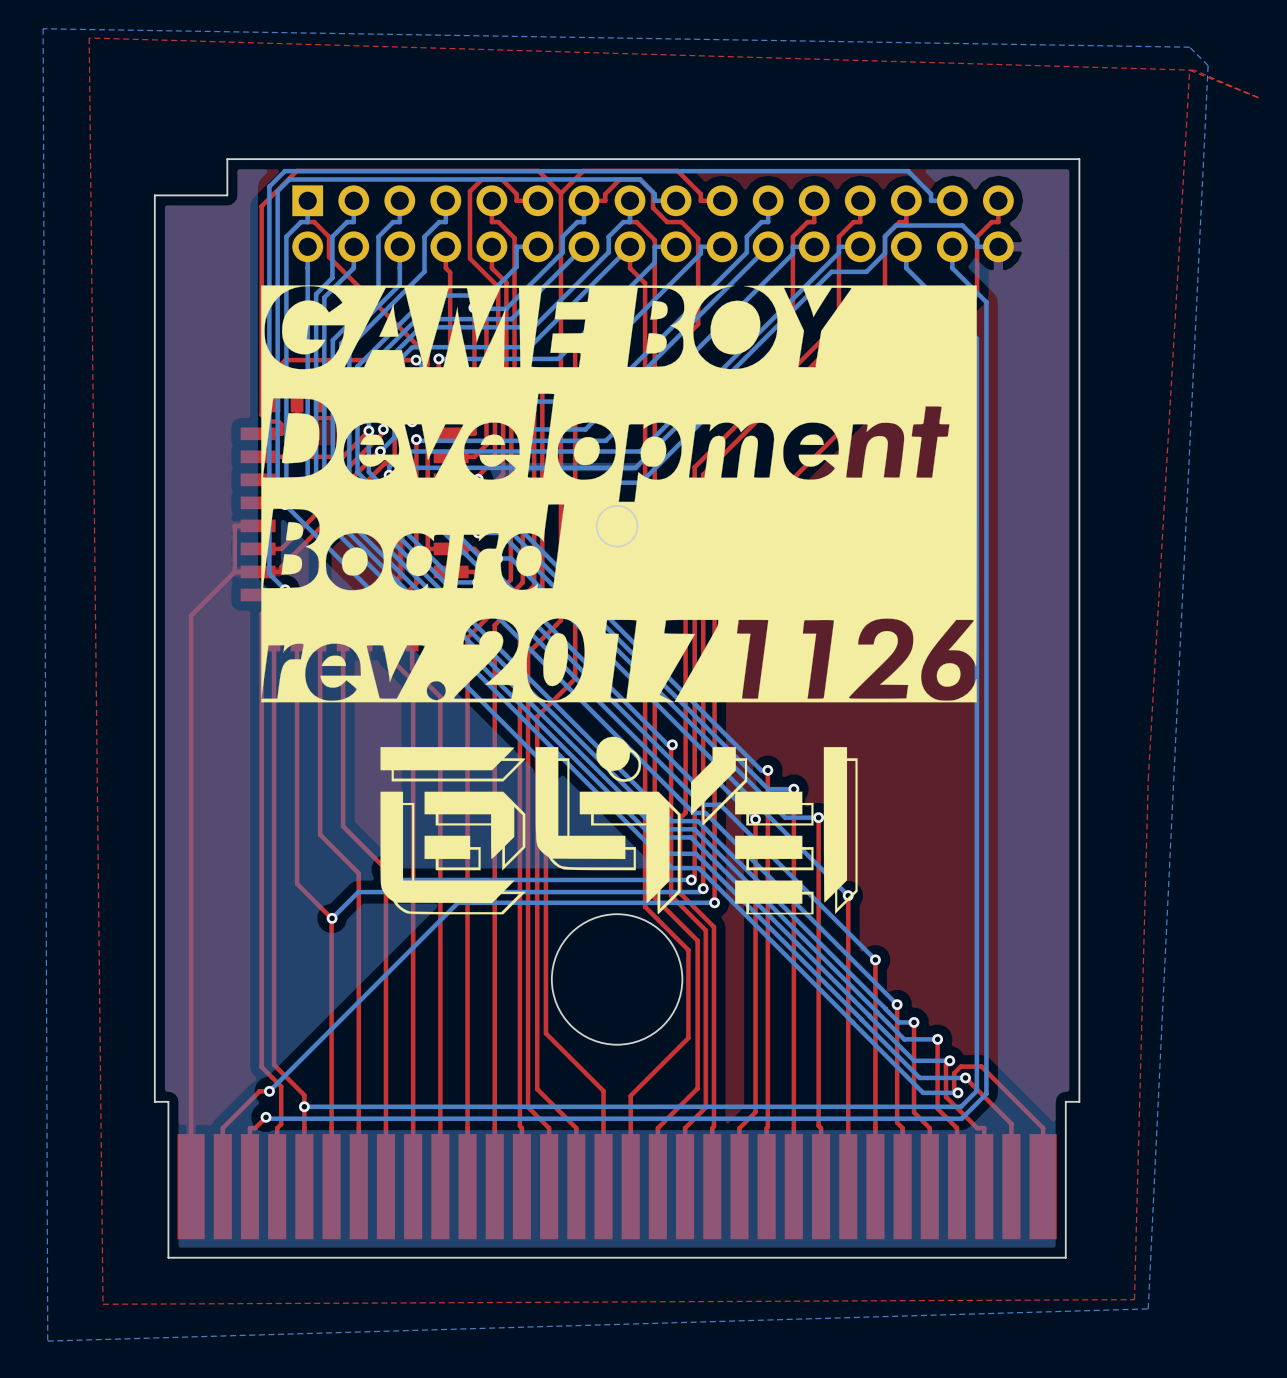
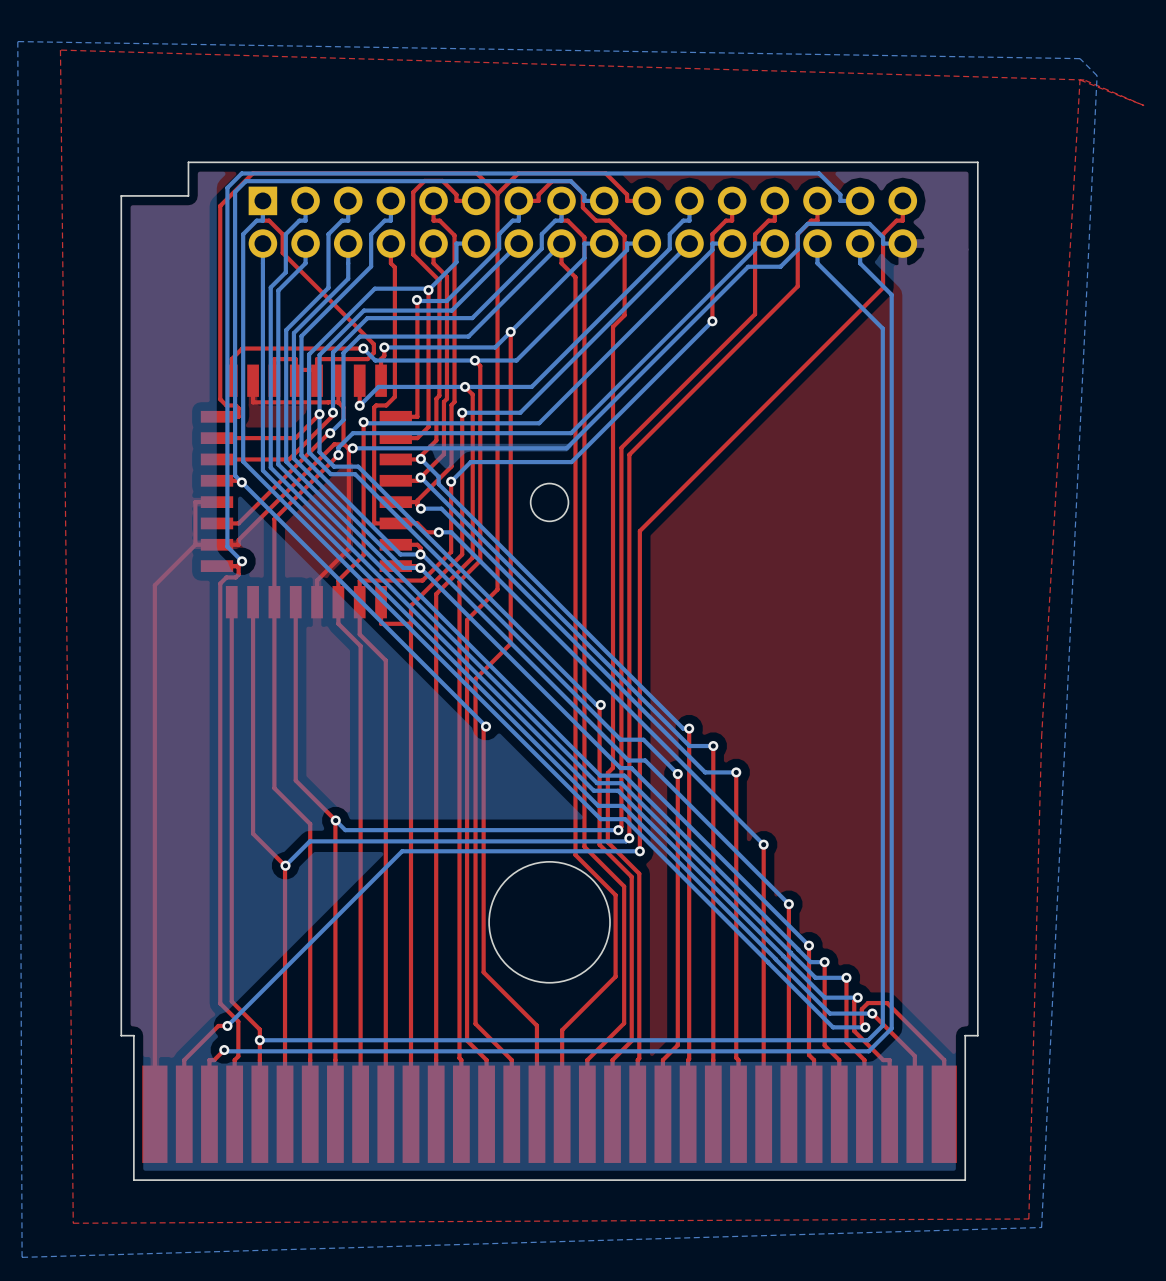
drawing: [261, 285, 977, 703] -> none
drawing: [380, 736, 858, 915] -> none

